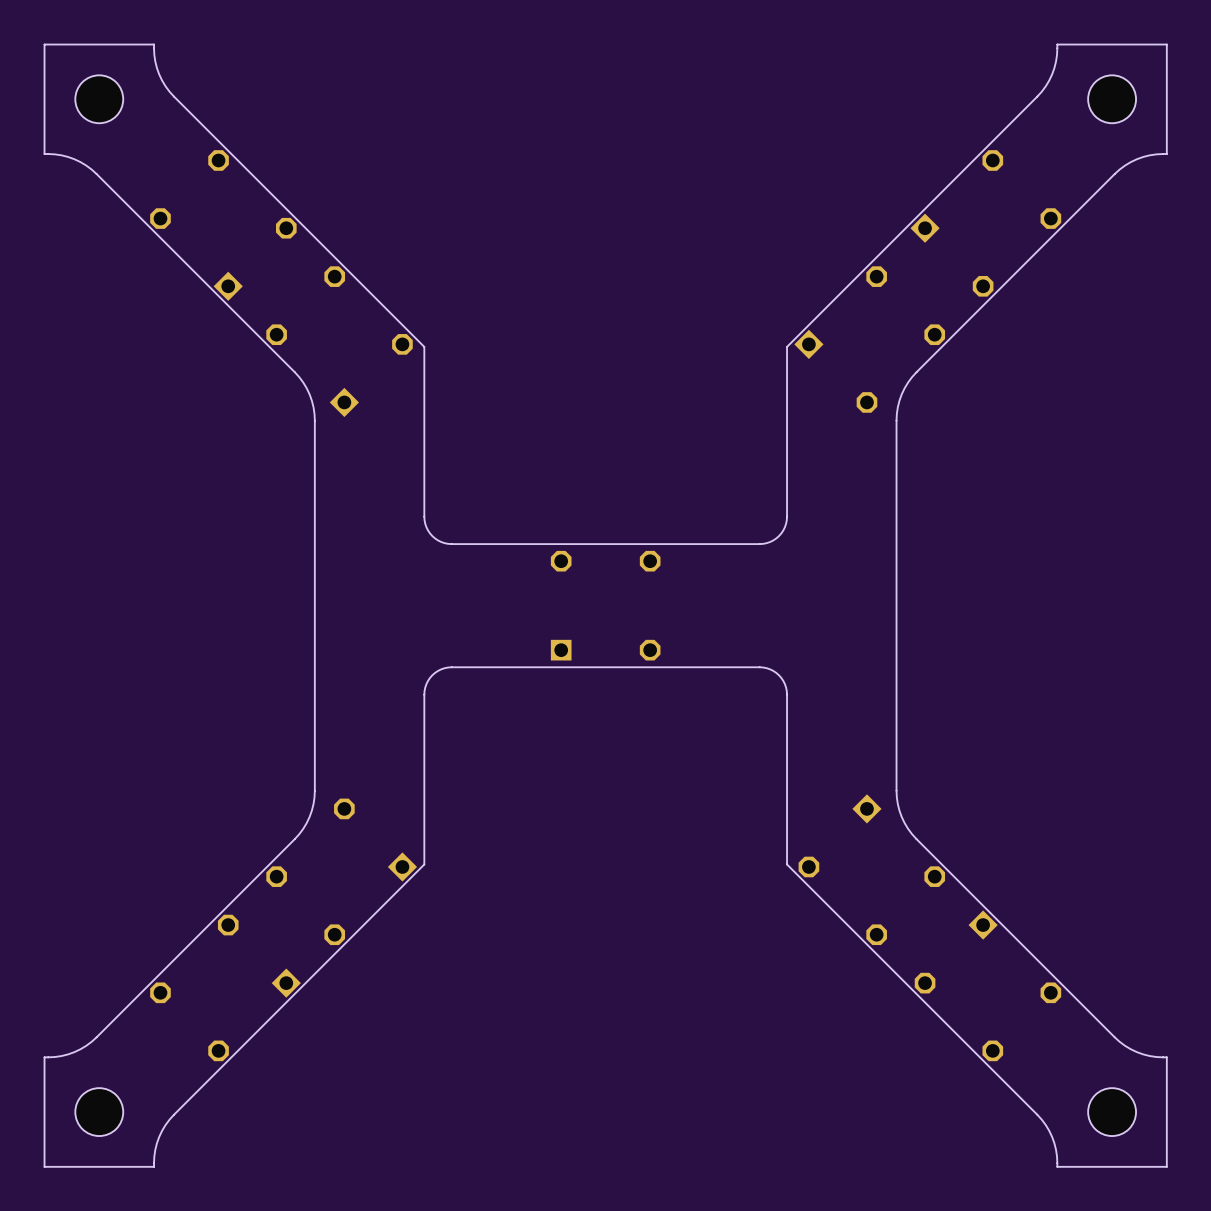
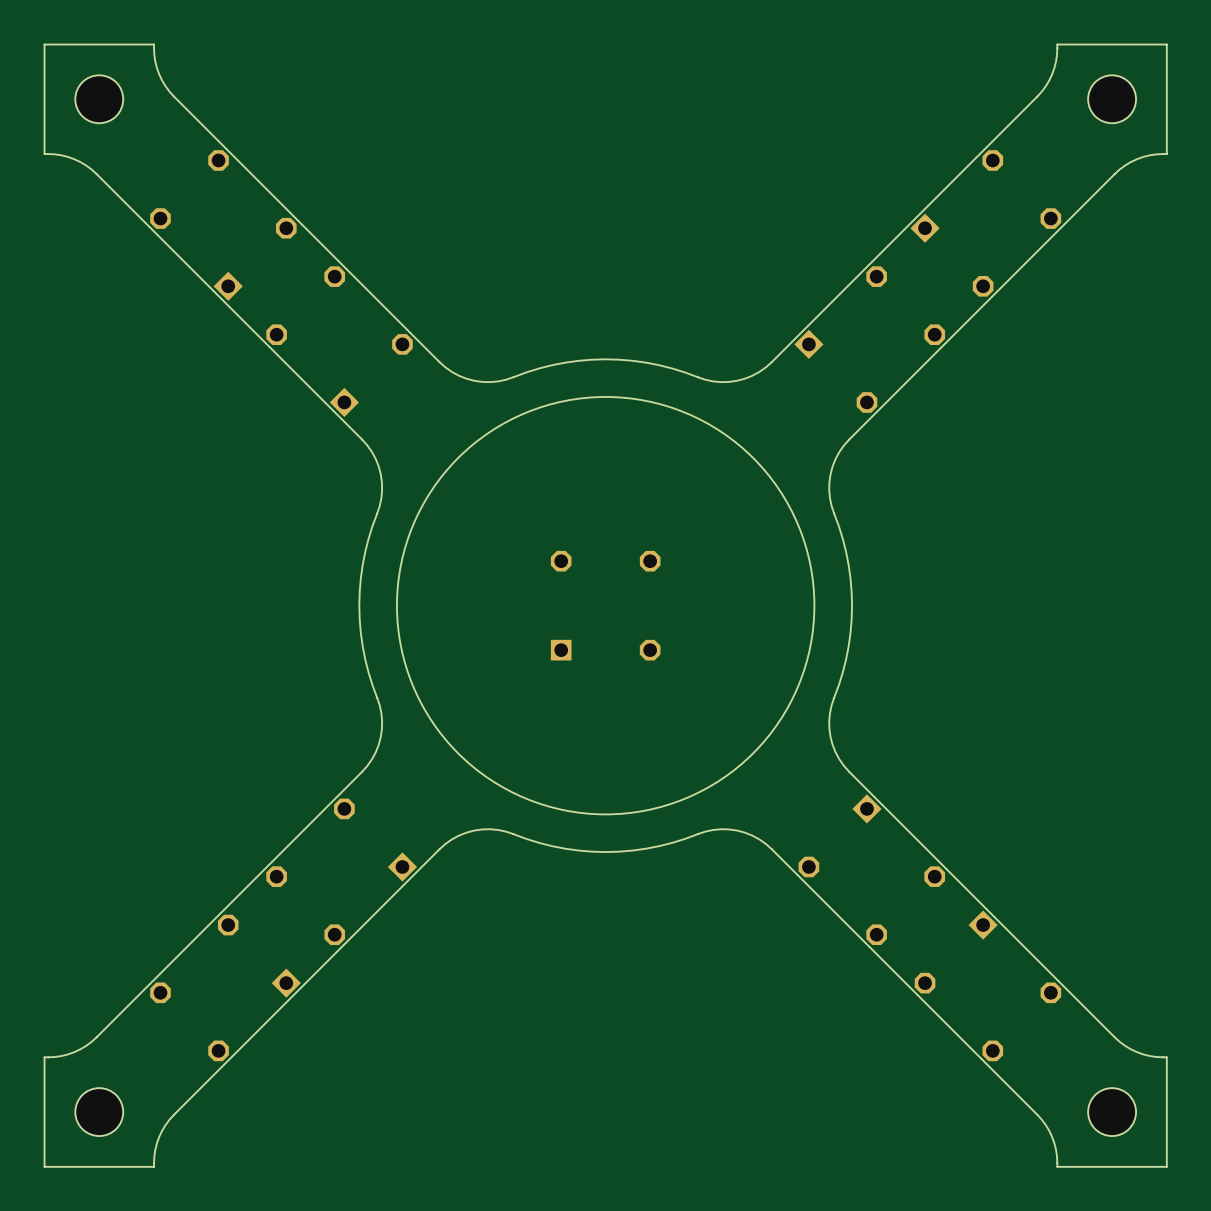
board edge: (424, 346) (424, 520) (428, 530) (435, 538) (451, 544) (759, 544) (773, 540) (783, 530) (786, 520) (787, 346) -> (424, 346) (445, 367) (459, 375) (474, 380) (490, 382) (505, 379) (552, 365) (605, 359) (645, 362) (672, 368) (705, 379) (729, 381) (744, 378) (759, 372) (787, 346)
board edge: (294, 372) (309, 394) (314, 420) (314, 790) (309, 816) (294, 839) -> (294, 372) (367, 445) (378, 466) (382, 490) (379, 505) (365, 552) (359, 605) (365, 659) (381, 713) (380, 737) (375, 752) (367, 765) (294, 839)
board edge: (916, 372) (901, 394) (896, 420) (896, 790) (901, 816) (916, 839) -> (916, 372) (843, 445) (832, 466) (829, 490) (831, 505) (846, 552) (852, 605) (846, 659) (829, 713) (830, 737) (835, 752) (843, 765) (916, 839)
round board edge: none -> [396, 396, 816, 816]
board edge: (424, 864) (424, 691) (428, 680) (435, 672) (451, 667) (759, 667) (773, 670) (783, 680) (786, 691) (787, 864) -> (424, 864) (445, 843) (459, 835) (474, 830) (490, 829) (505, 831) (552, 846) (605, 852) (645, 848) (672, 842) (705, 831) (729, 829) (744, 832) (759, 839) (787, 864)

